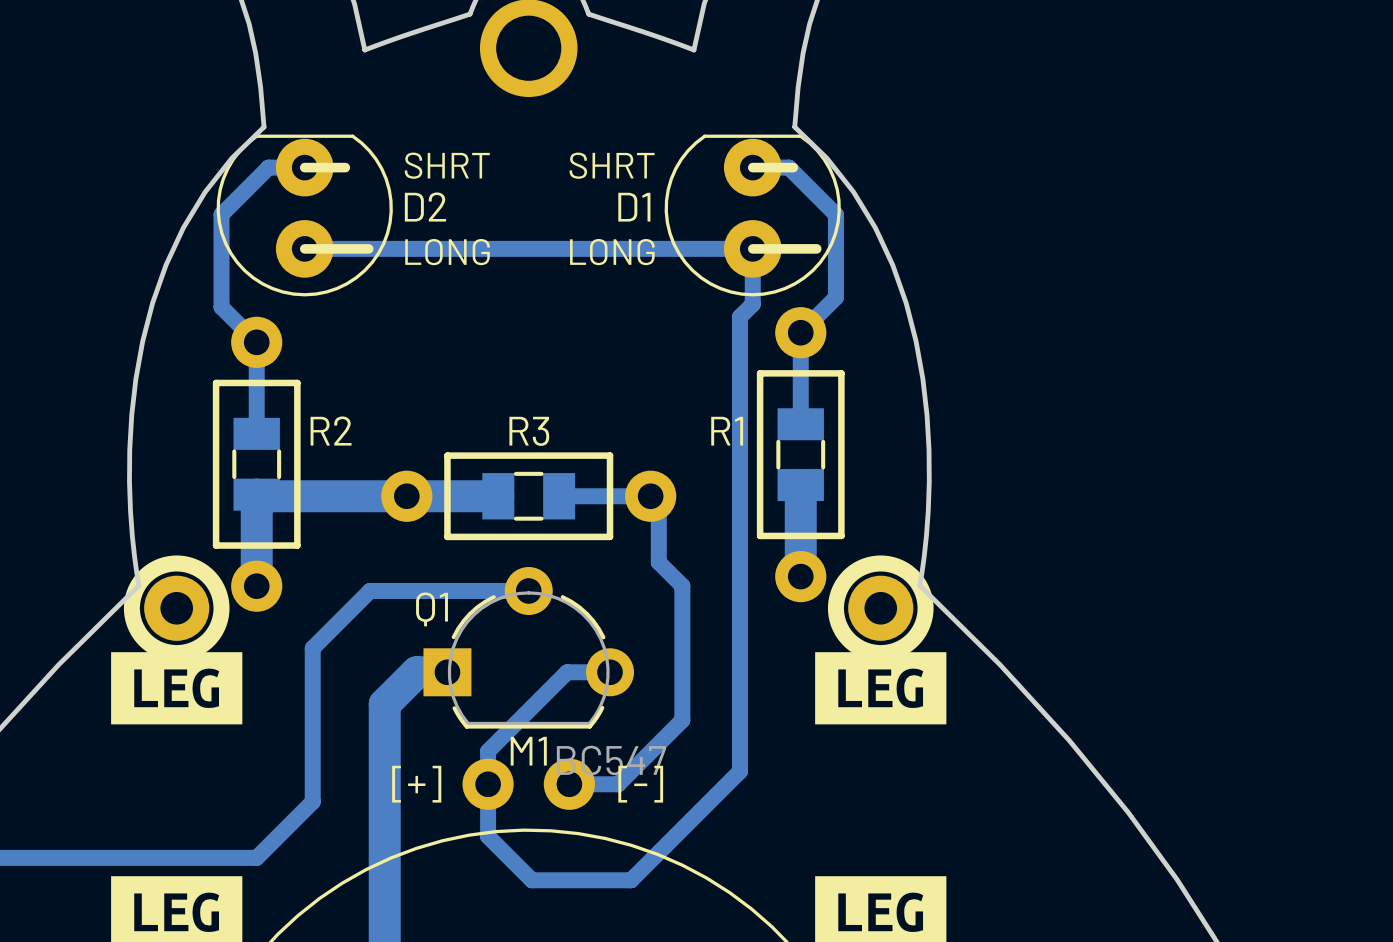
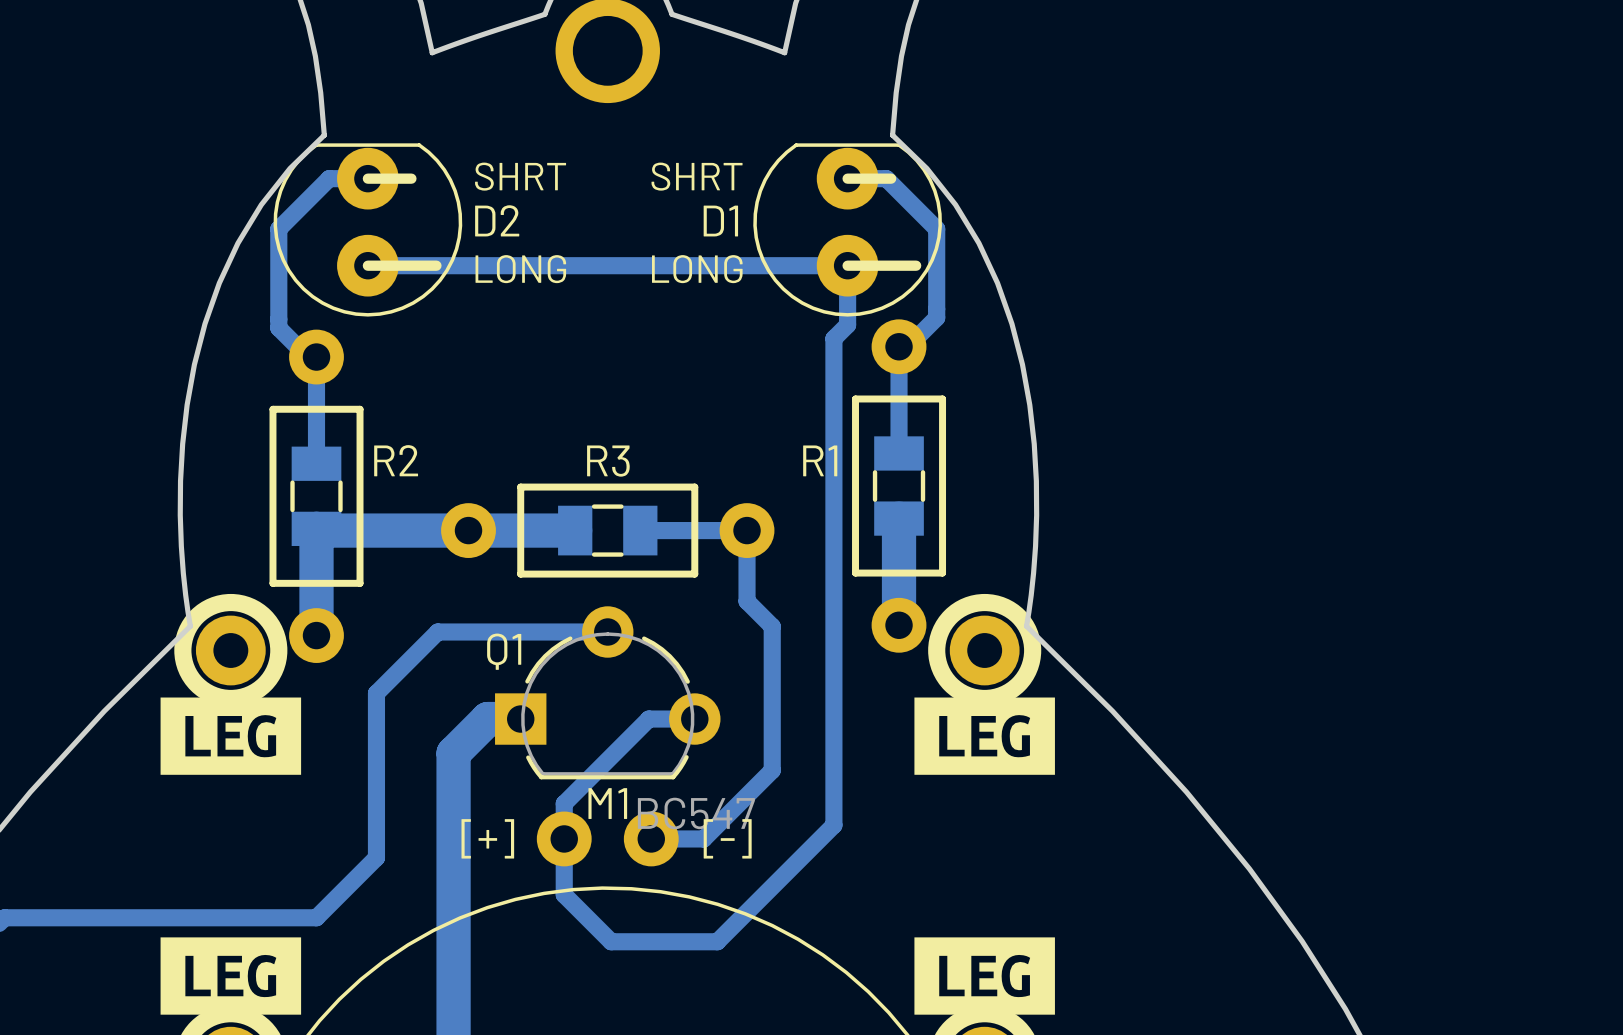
R1 footprint: [756, 307, 845, 603] -> [852, 319, 947, 653]
R2 footprint: [212, 316, 301, 612] -> [269, 329, 364, 663]
R3 footprint: [381, 452, 677, 541] -> [441, 483, 775, 578]

